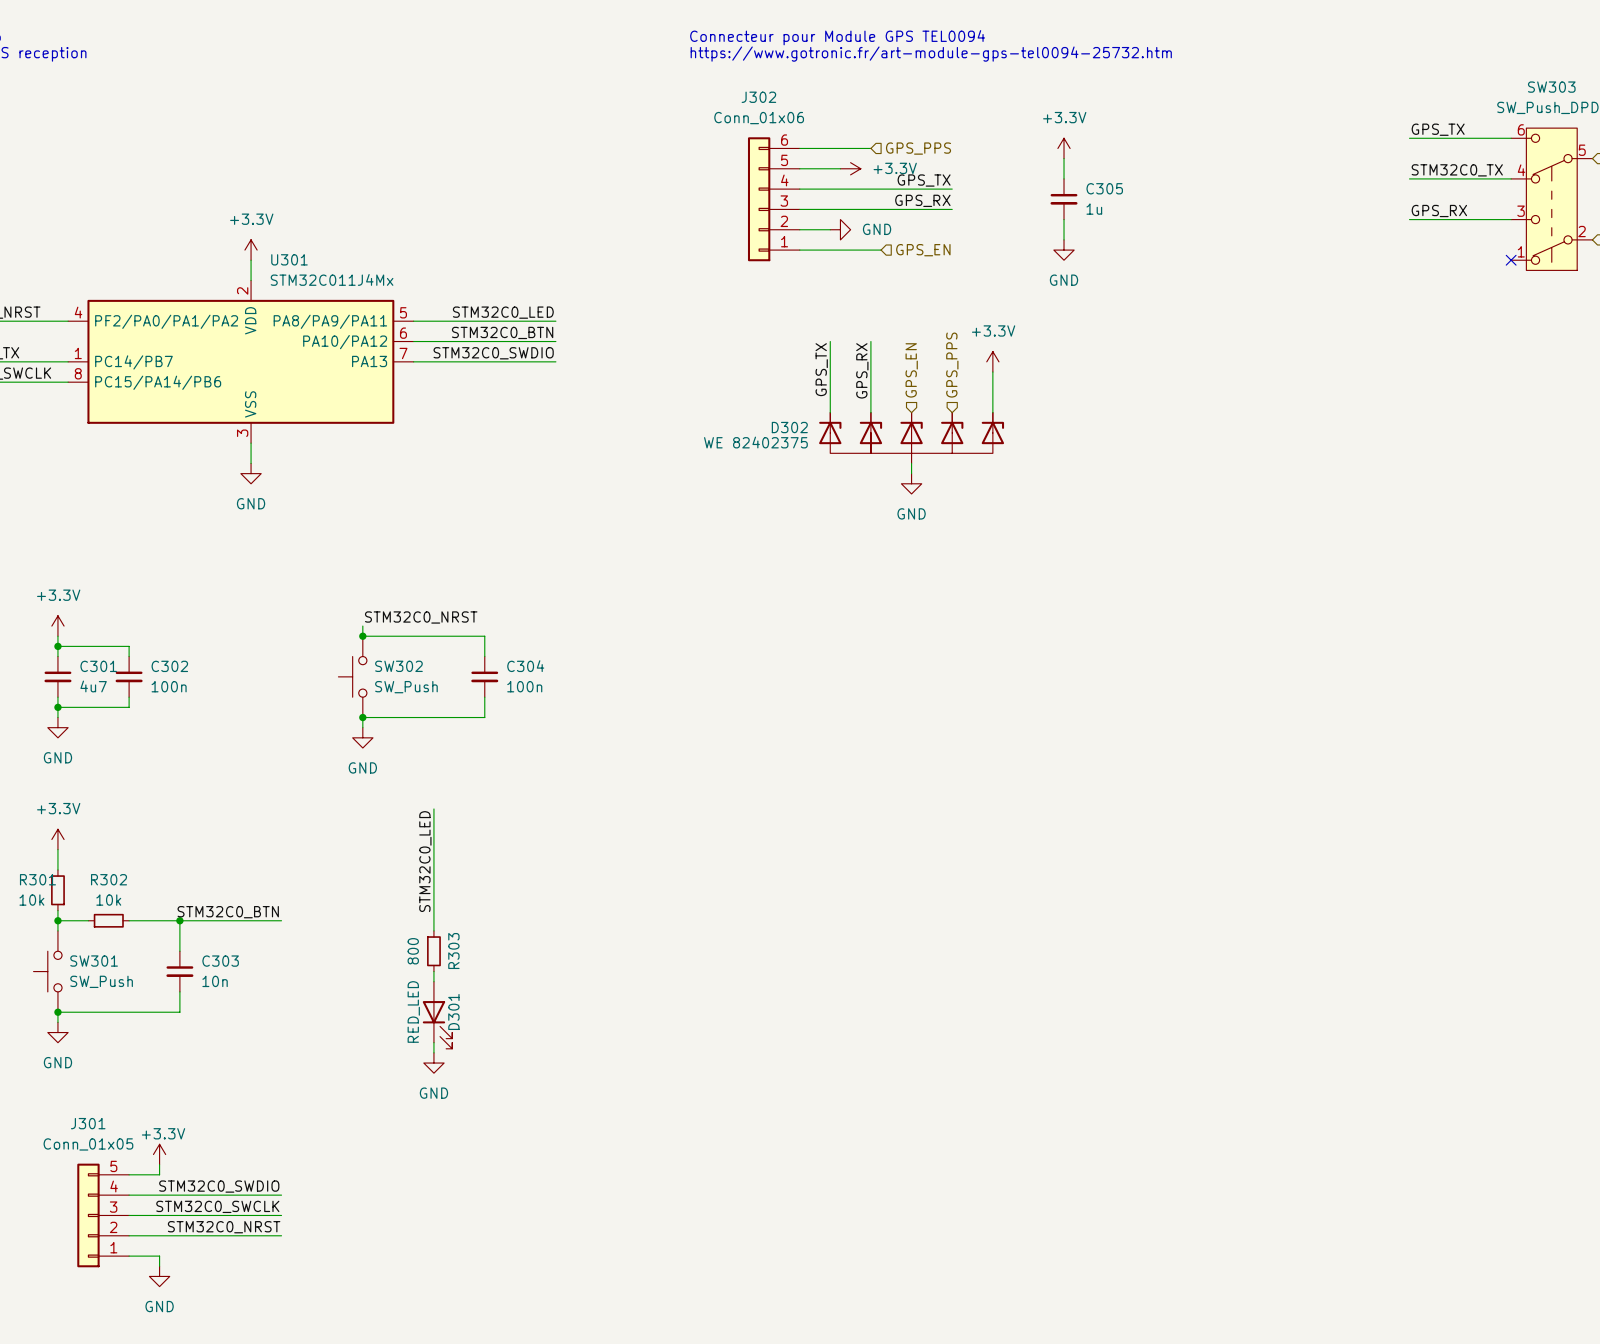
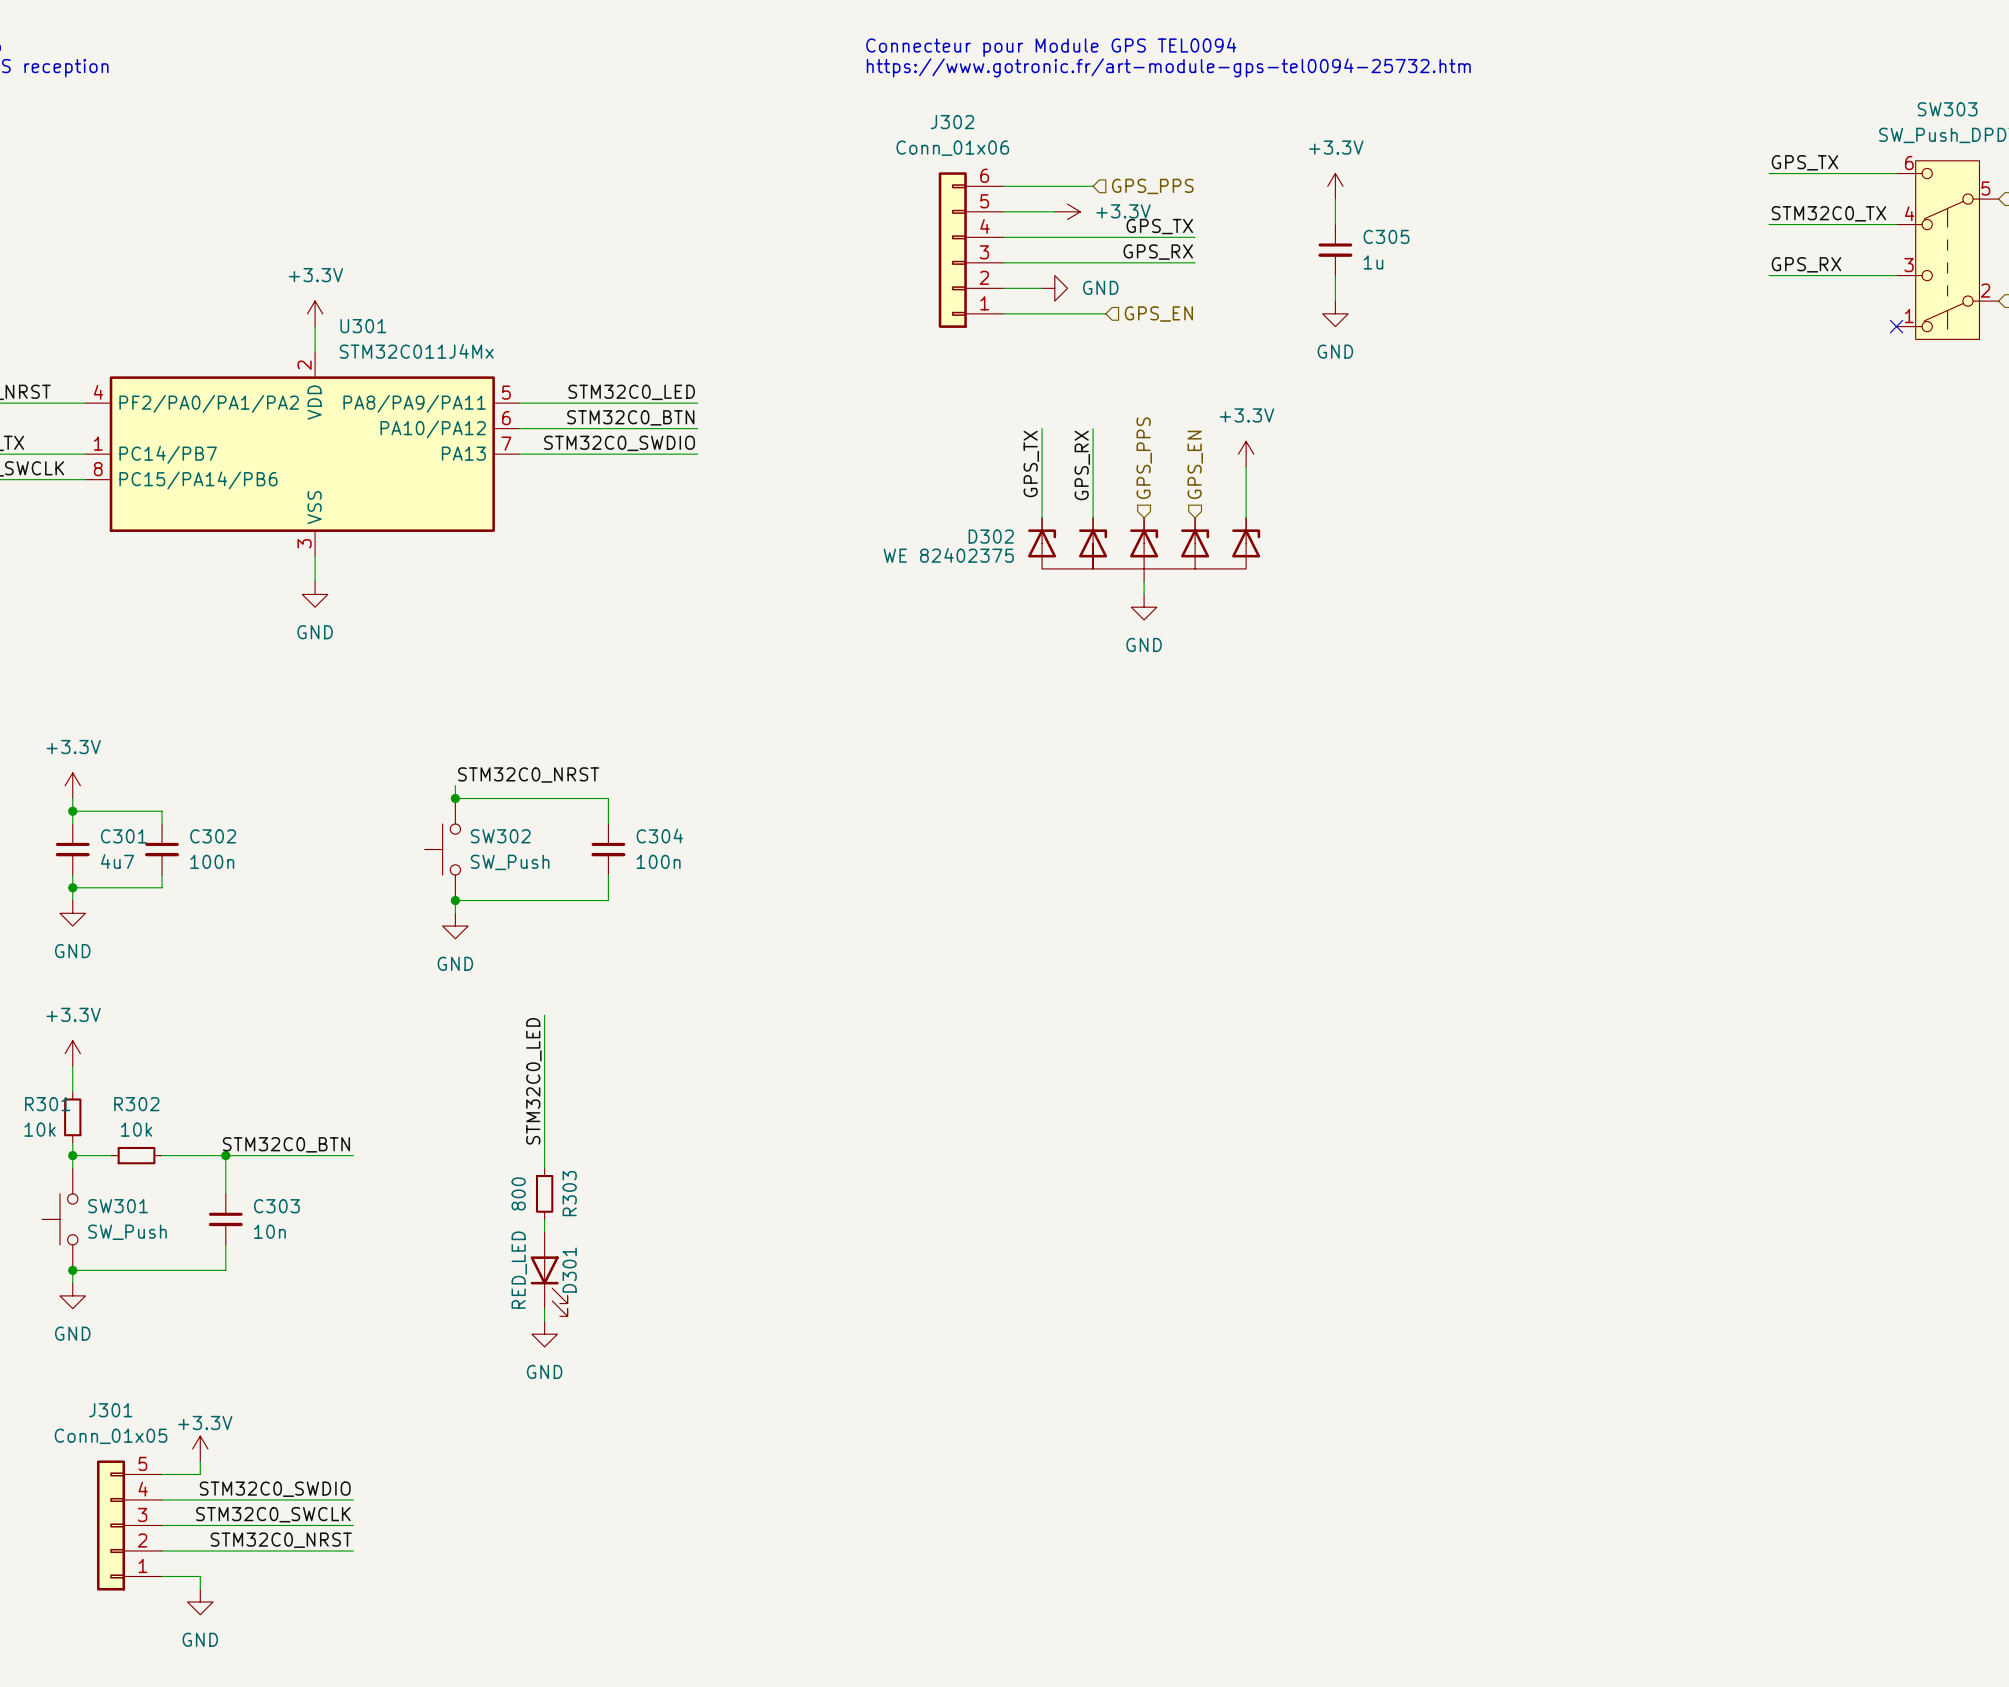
hierarchical label: GPS_PPS (952, 365) -> GPS_EN (1195, 464)
hierarchical label: GPS_EN (911, 370) -> GPS_PPS (1144, 458)

